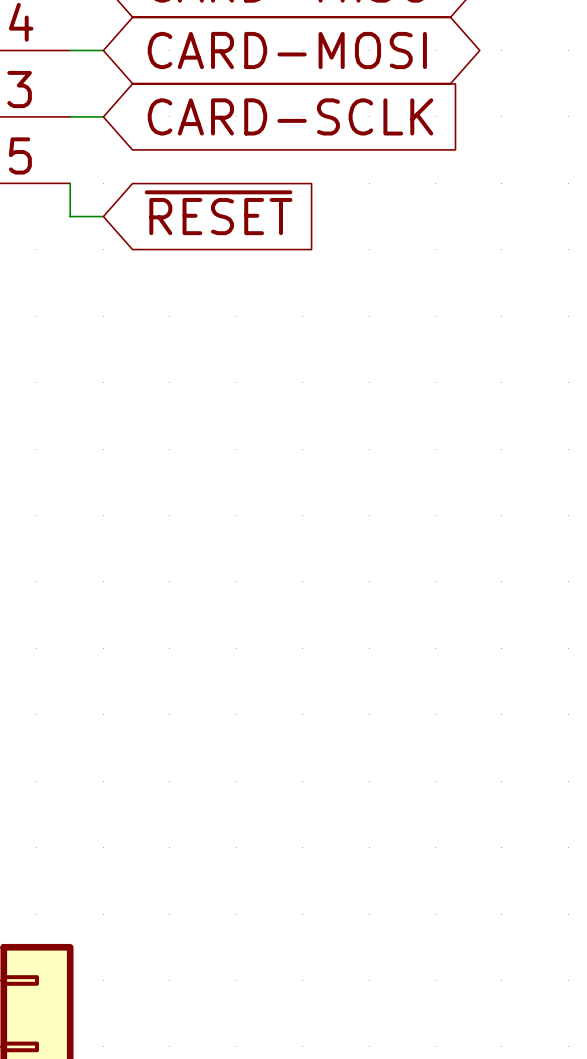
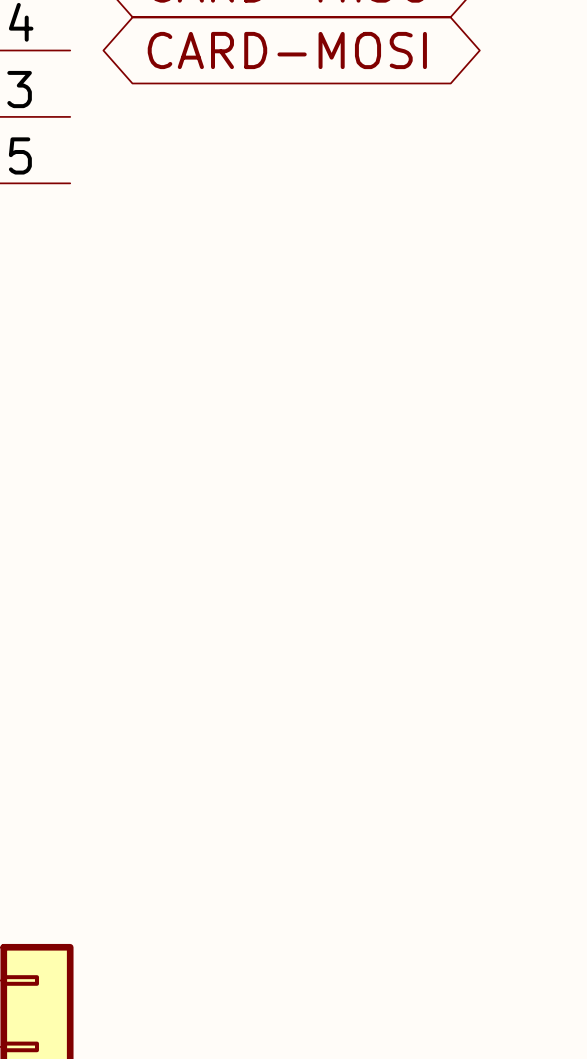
wire: (70, 50) (103, 50) -> none
wire: (70, 116) (103, 116) -> none
global label: CARD-SCLK (290, 116) -> none
wire: (70, 183) (70, 216) (103, 216) -> none
global label: ~{RESET} (218, 212) -> none

